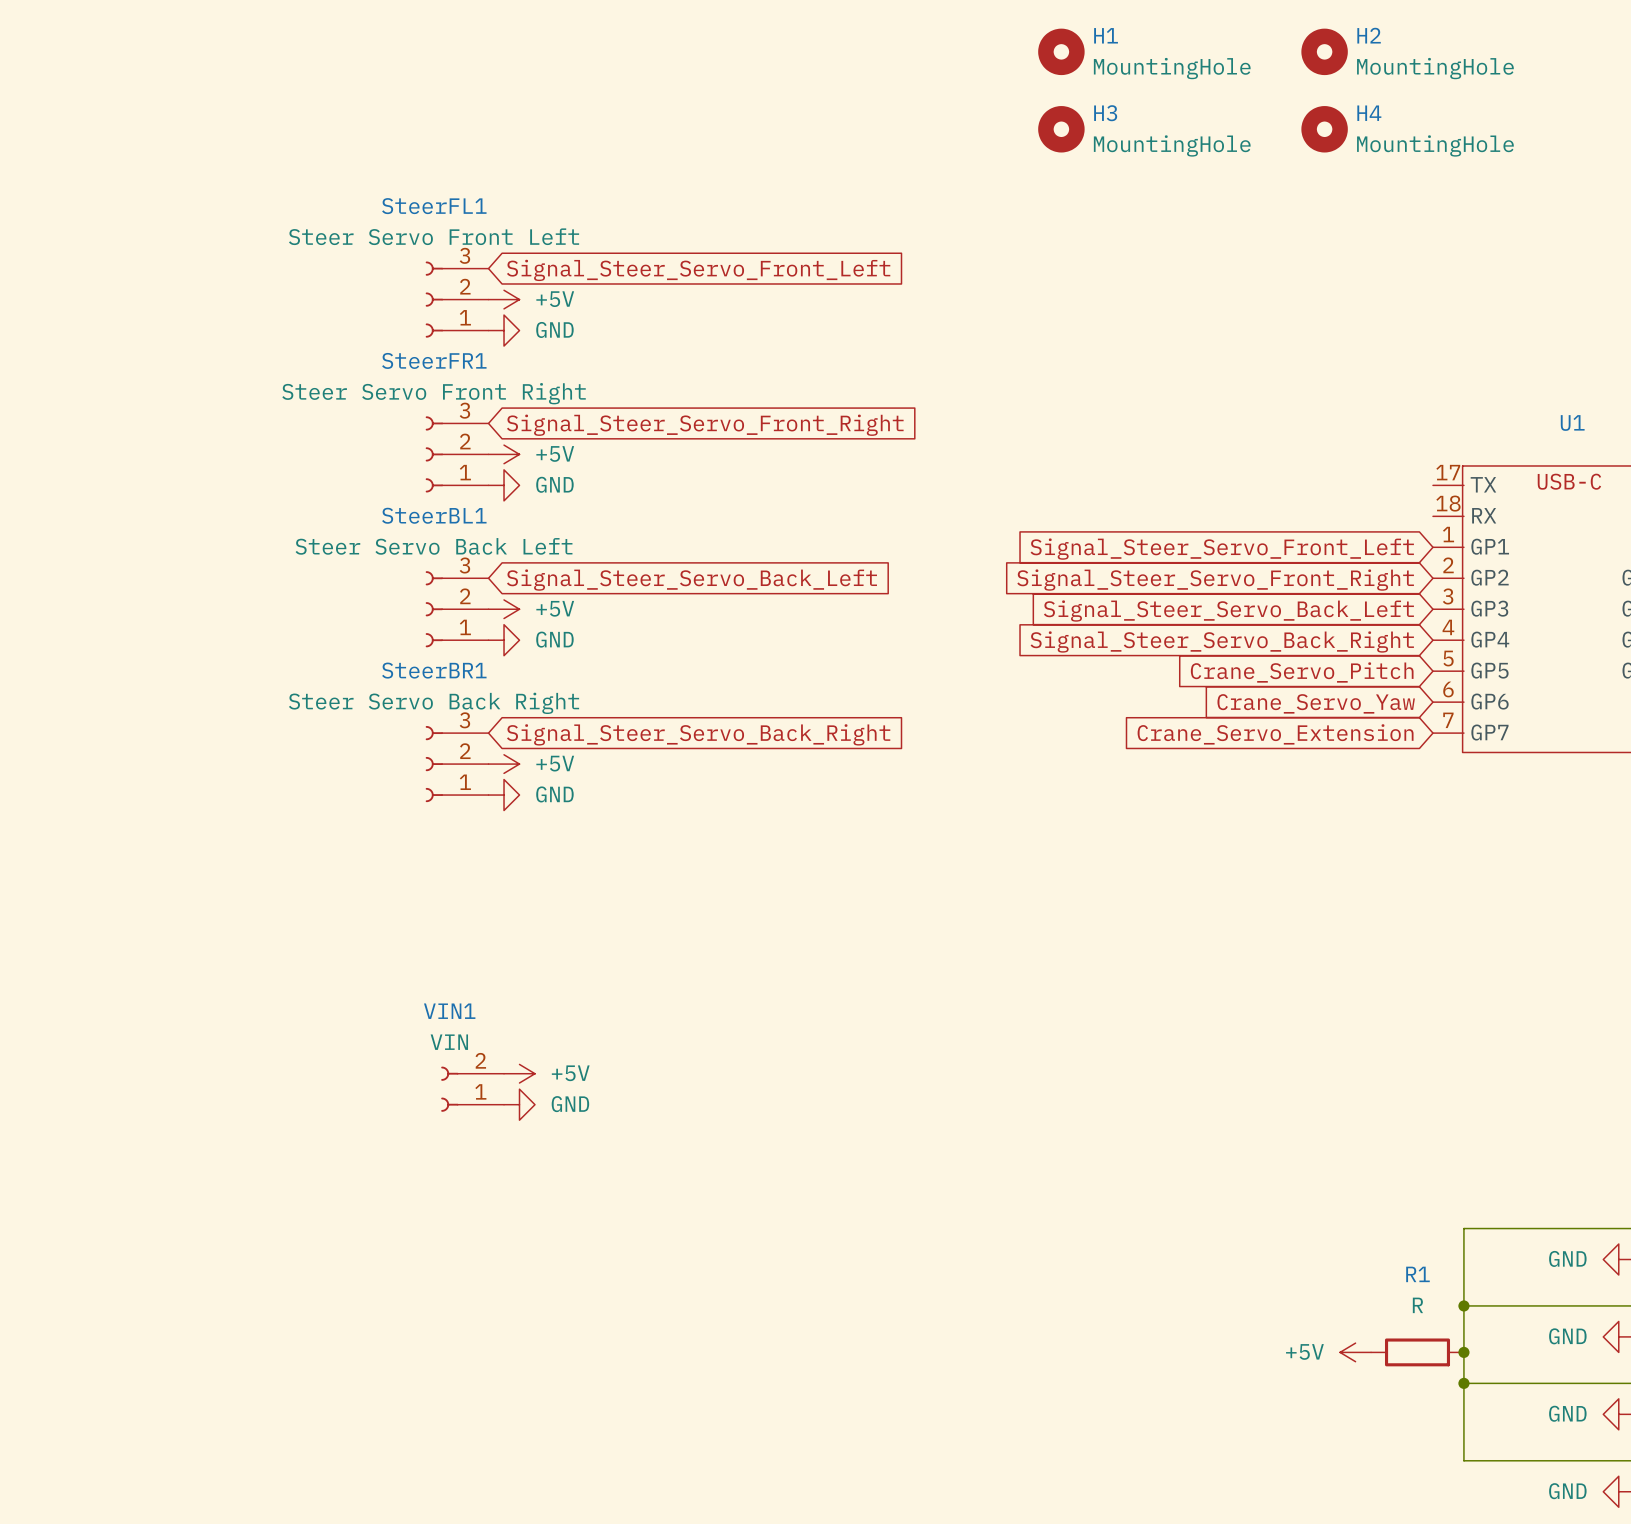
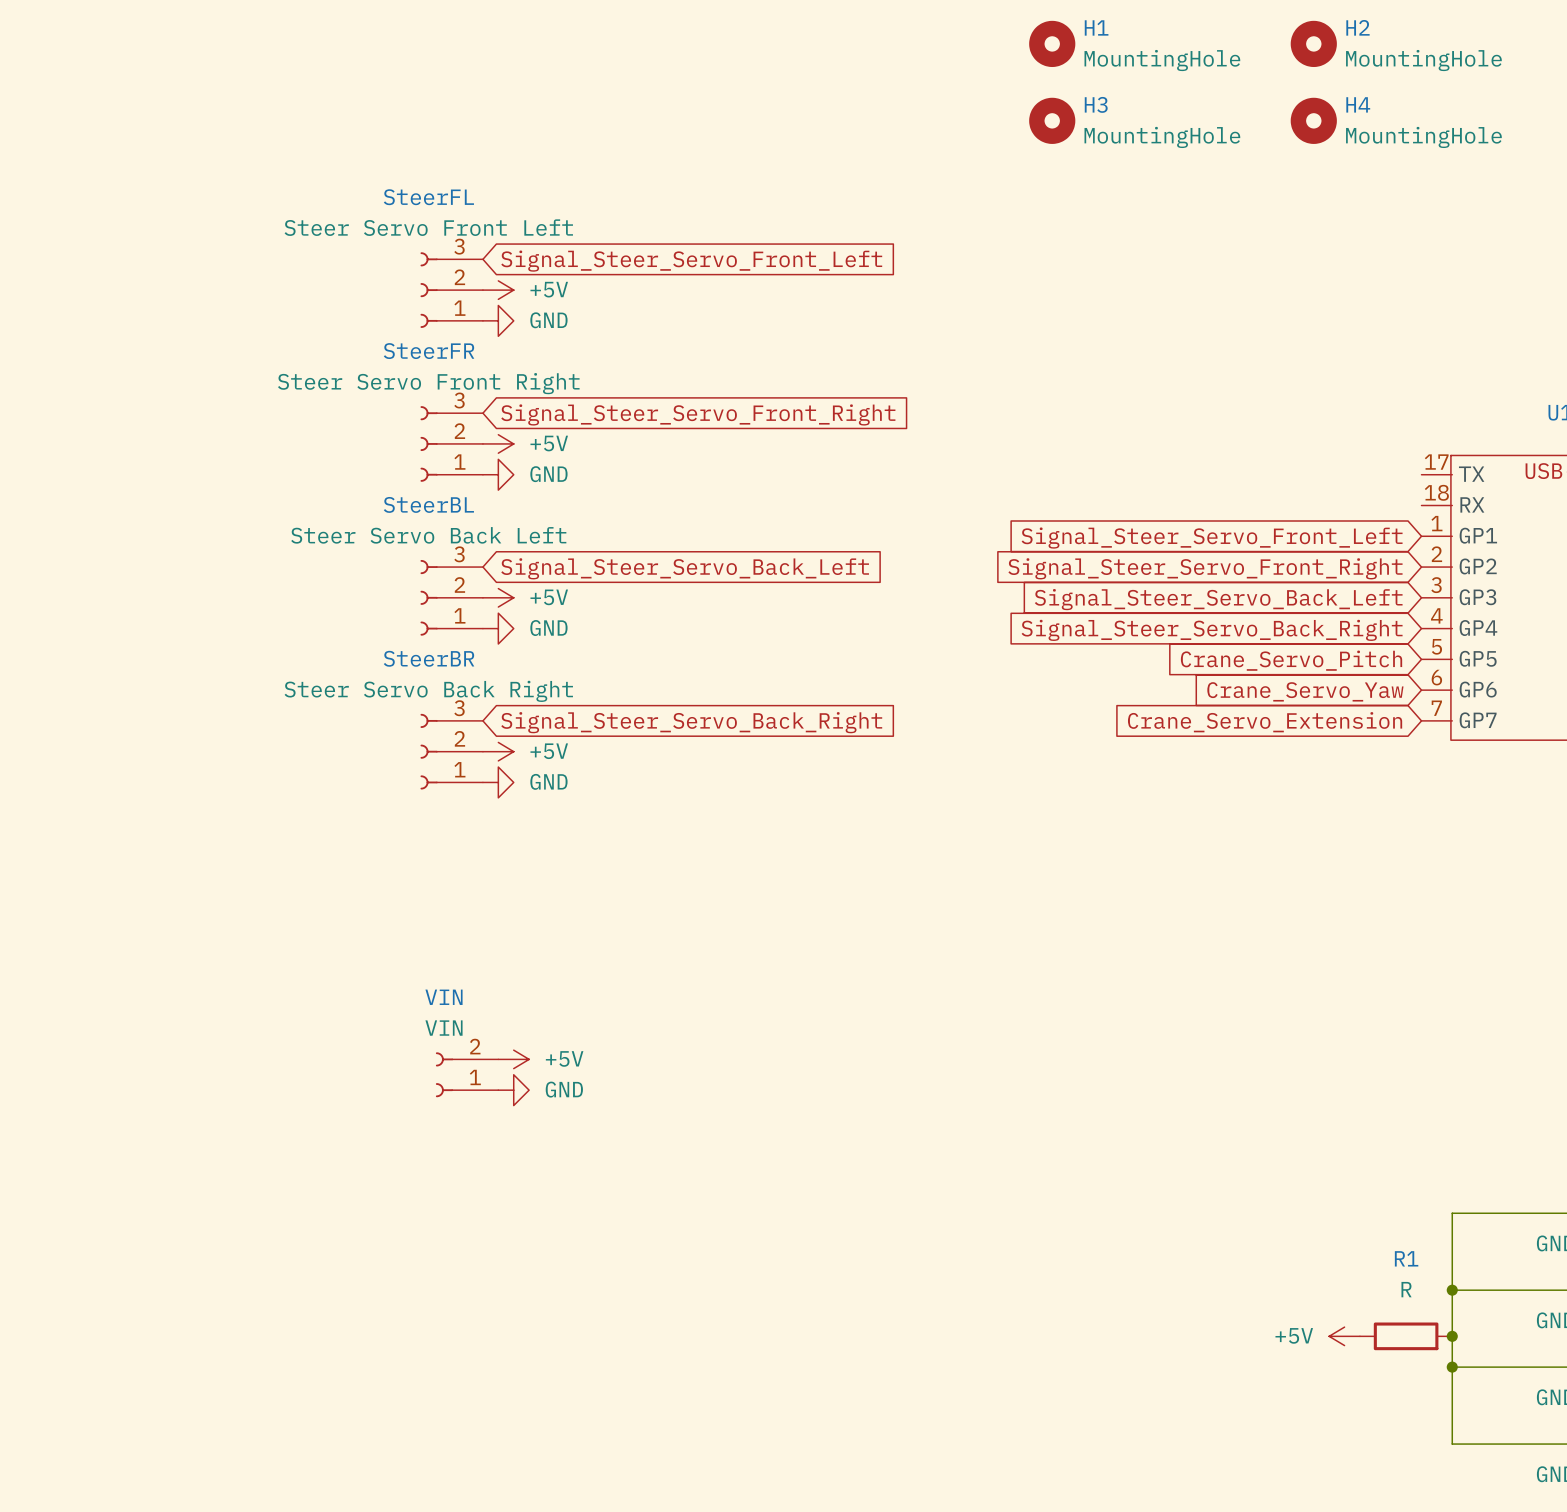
SteerFL1 name: SteerFL1 (434, 206) -> SteerFL (428, 197)
SteerFR1 name: SteerFR1 (434, 360) -> SteerFR (429, 351)
SteerBL1 name: SteerBL1 (434, 515) -> SteerBL (428, 504)
SteerBR1 name: SteerBR1 (434, 670) -> SteerBR (429, 658)
VIN1 name: VIN1 (449, 1011) -> VIN (444, 997)

